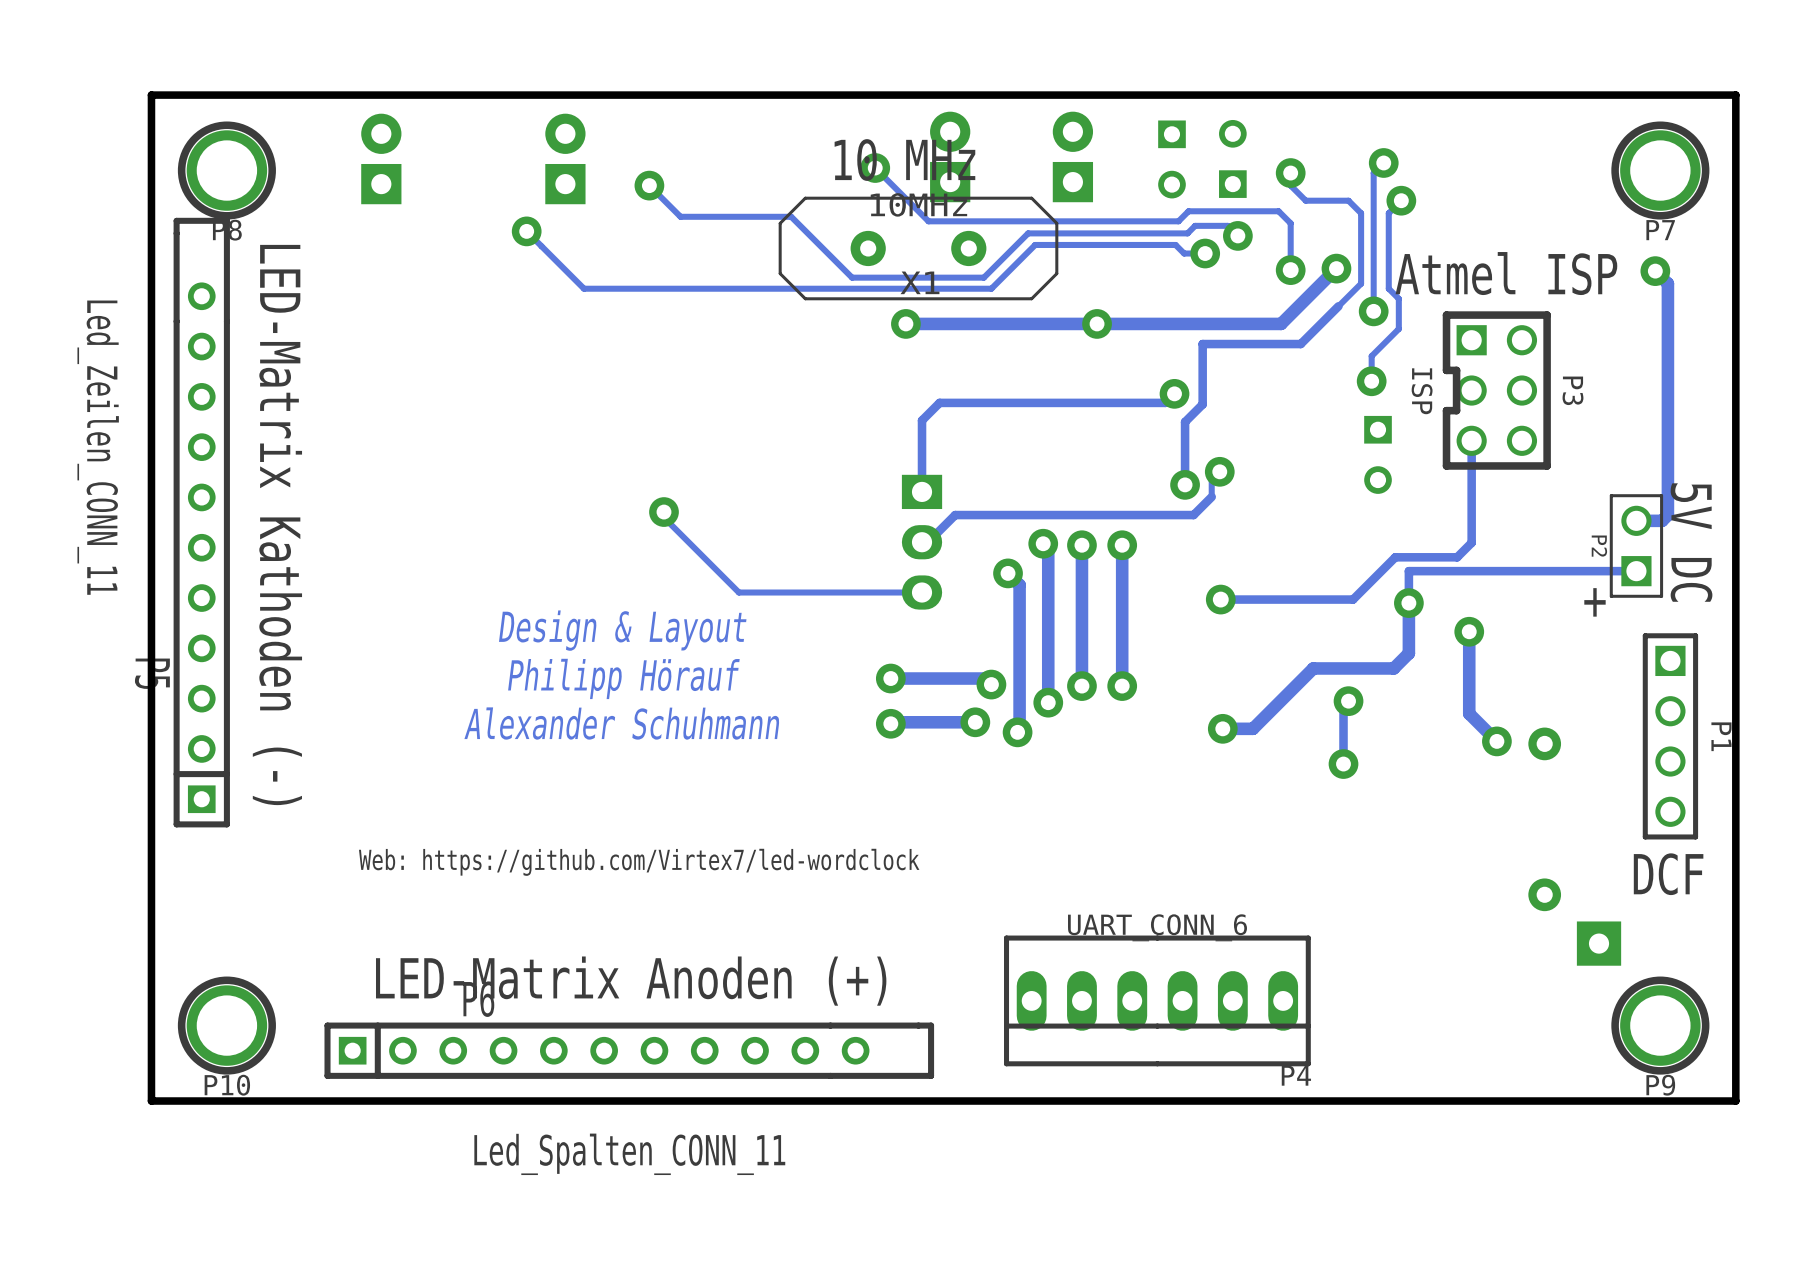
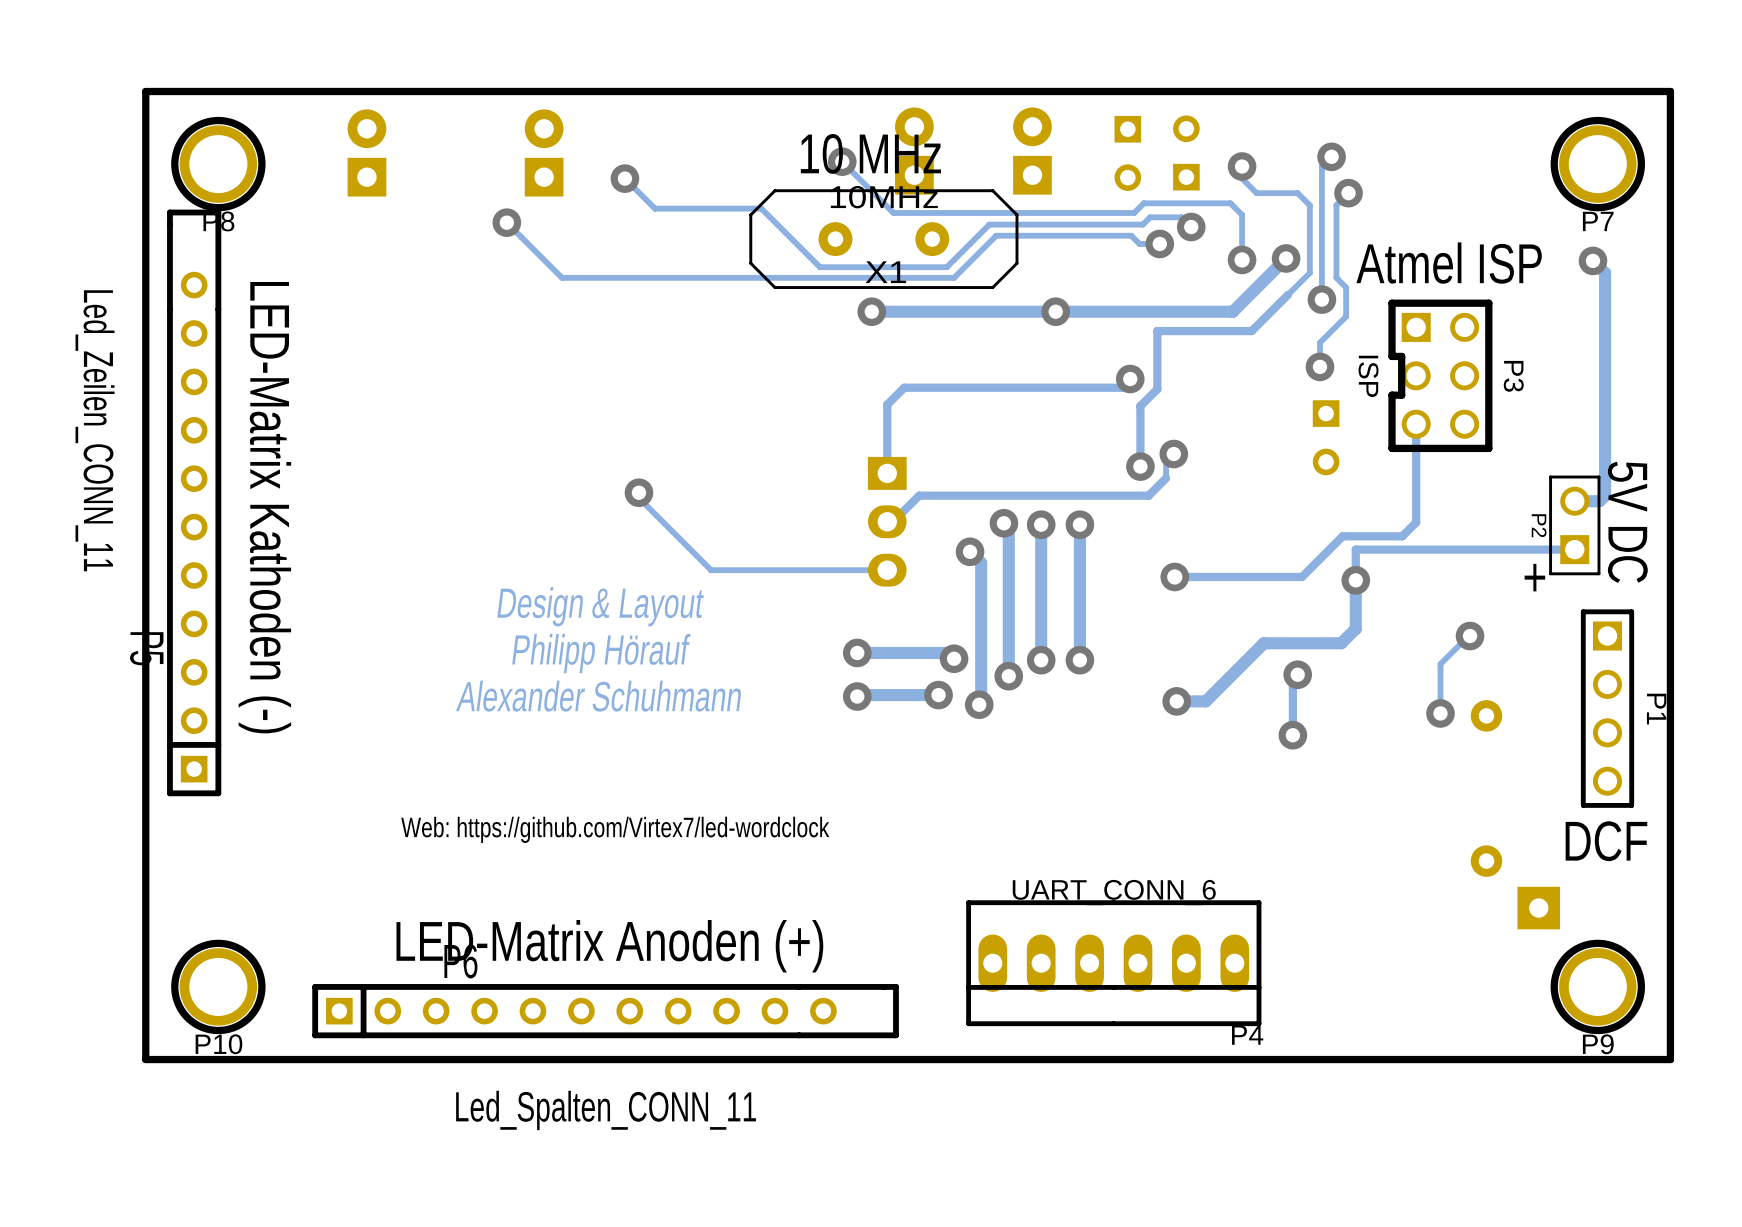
track: (1469, 631) (1469, 713) (1496, 741) -> (1470, 636) (1440, 664) (1440, 713)
via position: (1469, 631) -> (1470, 636)

